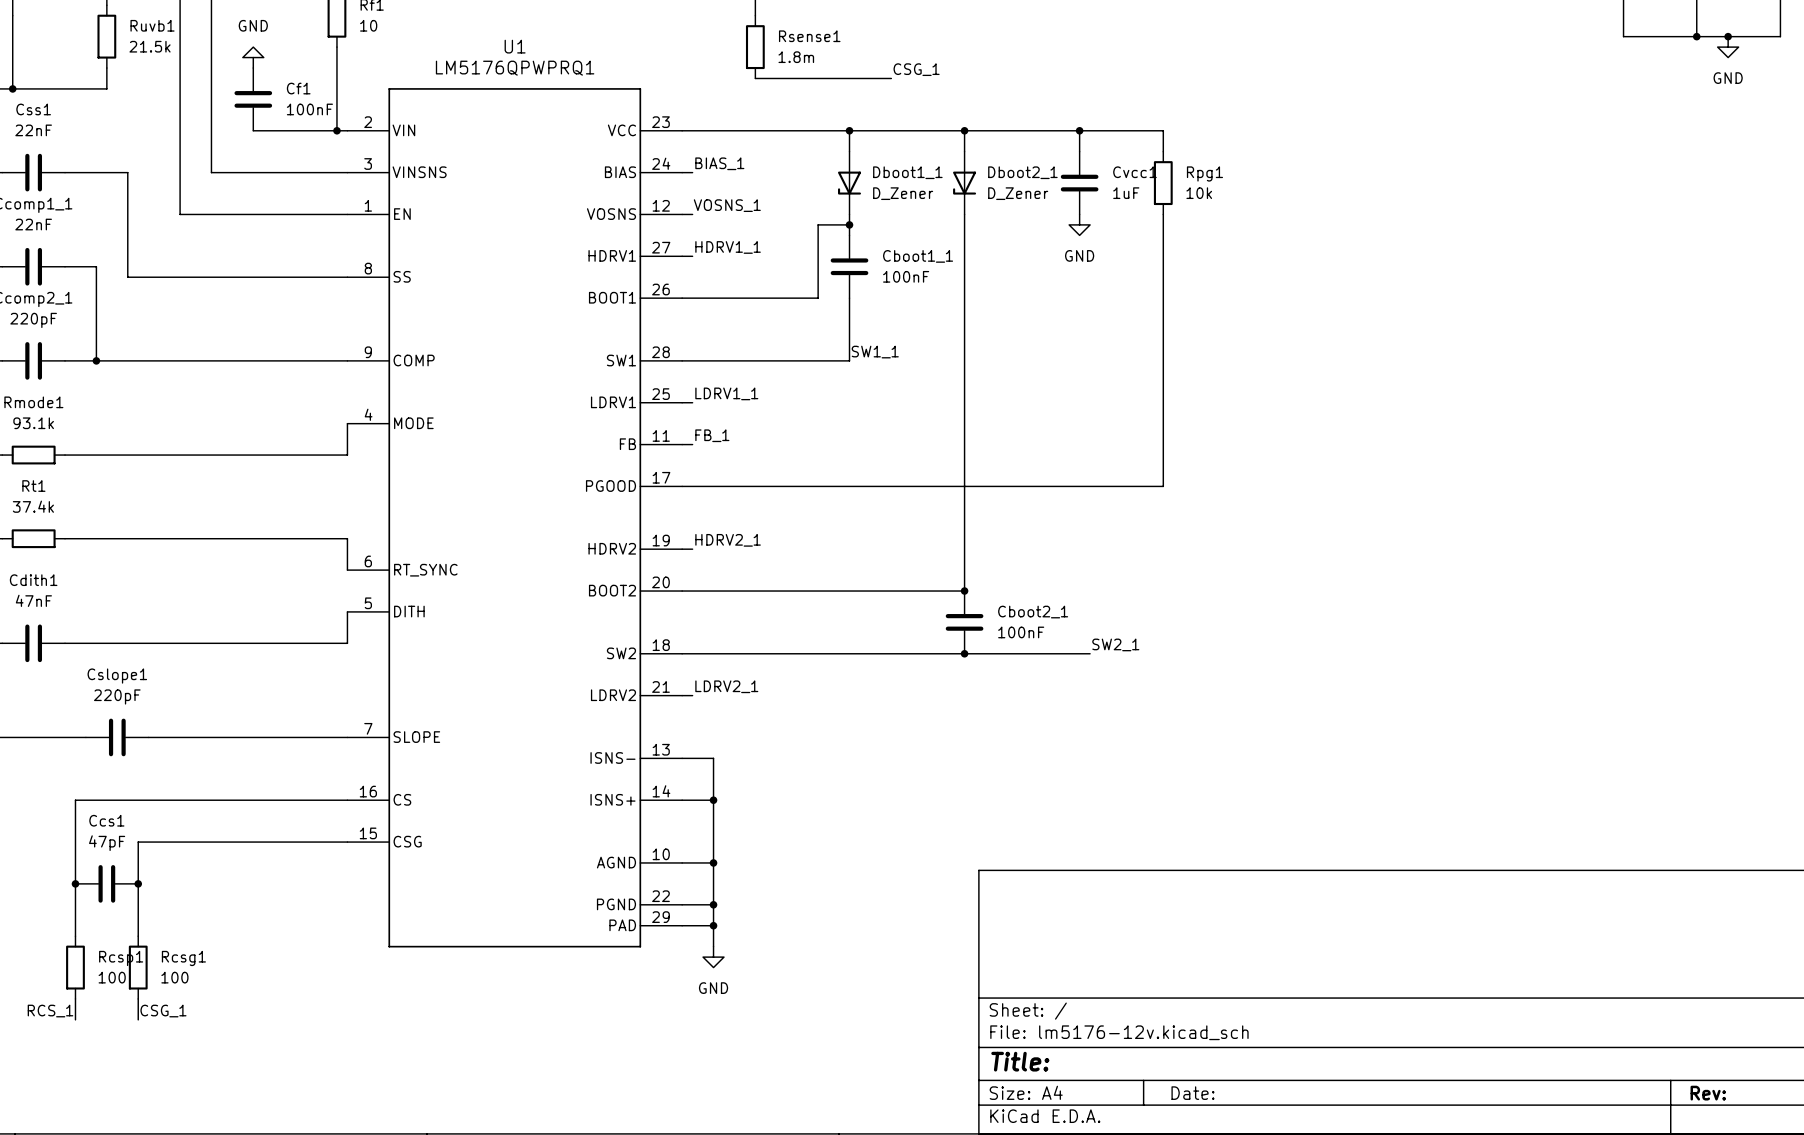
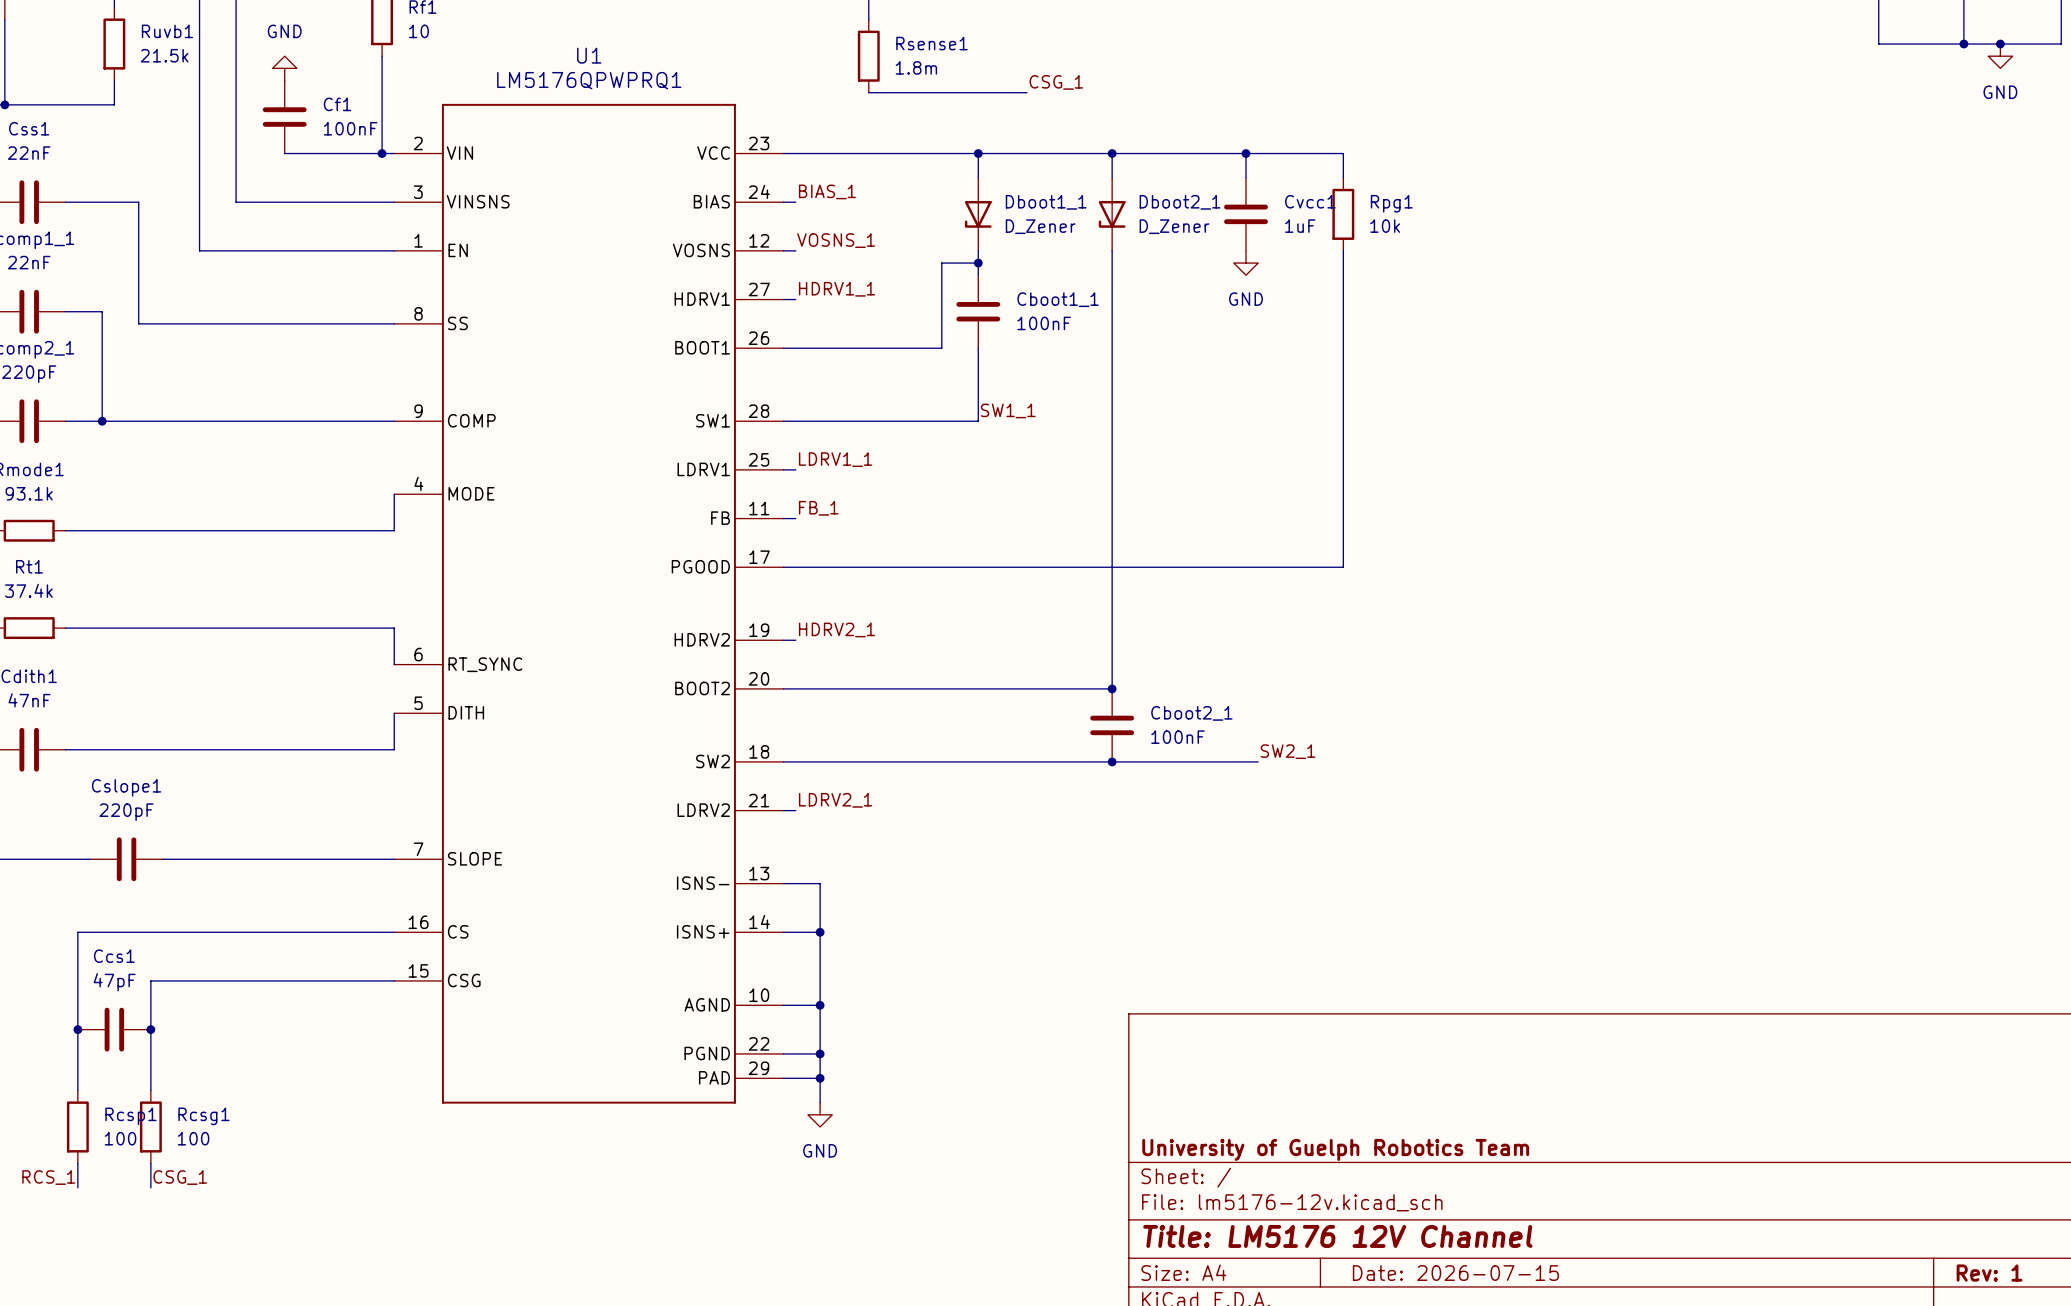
title block: none -> University of Guelph Robotics Team (1335, 1149)
title block: Title: (1020, 1061) -> Title: LM5176 12V Channel (1337, 1236)
title block: Date: (1192, 1093) -> Date: 2026-07-15 (1455, 1273)
title block: Rev: (1708, 1093) -> Rev: 1 (1989, 1273)

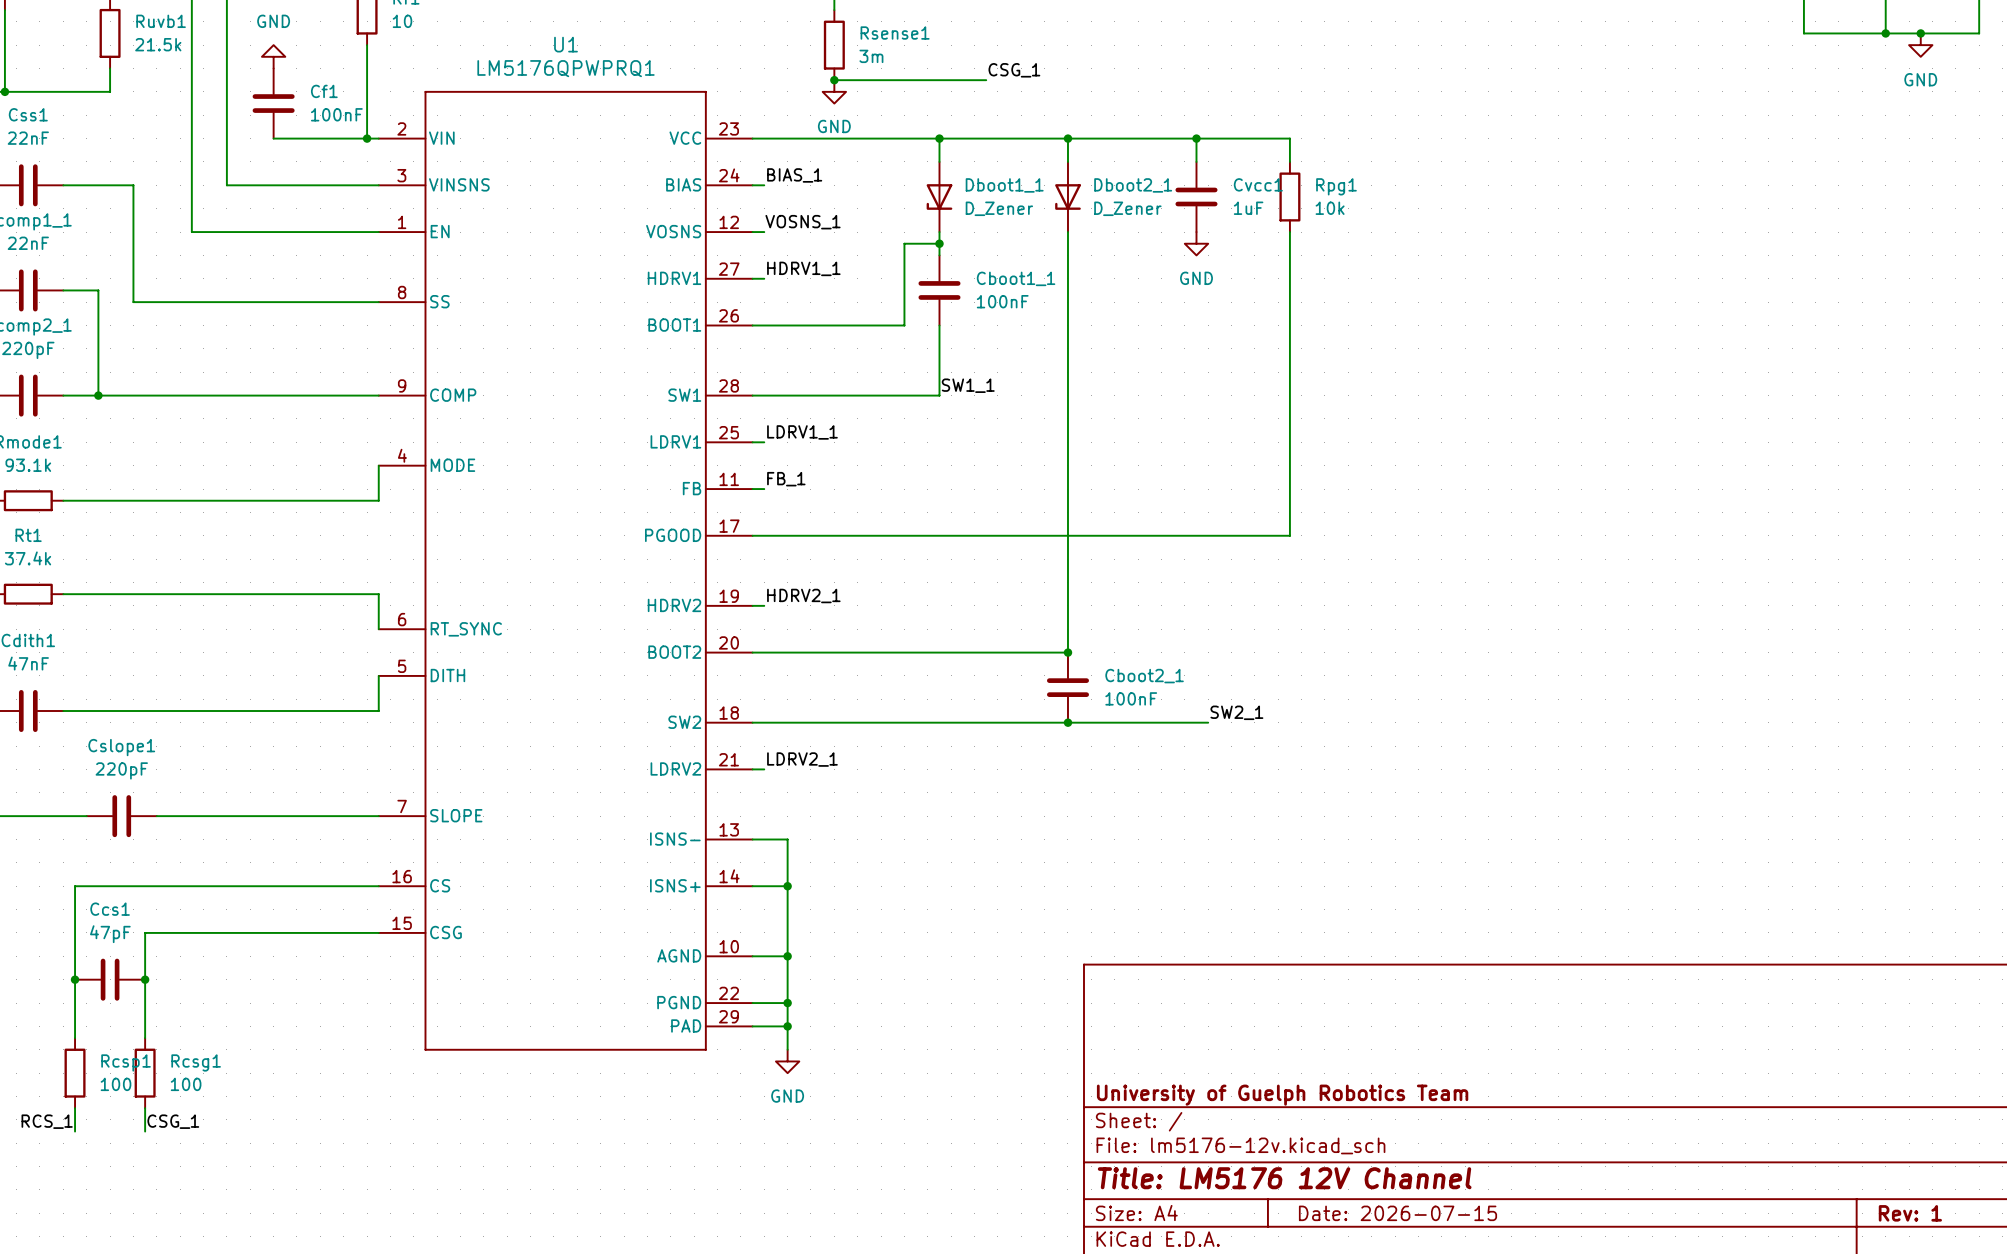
Rsense1 value: 1.8m (916, 67) -> 3m (871, 56)
junction: none -> (834, 80)
power symbol: none -> GND (834, 91)

